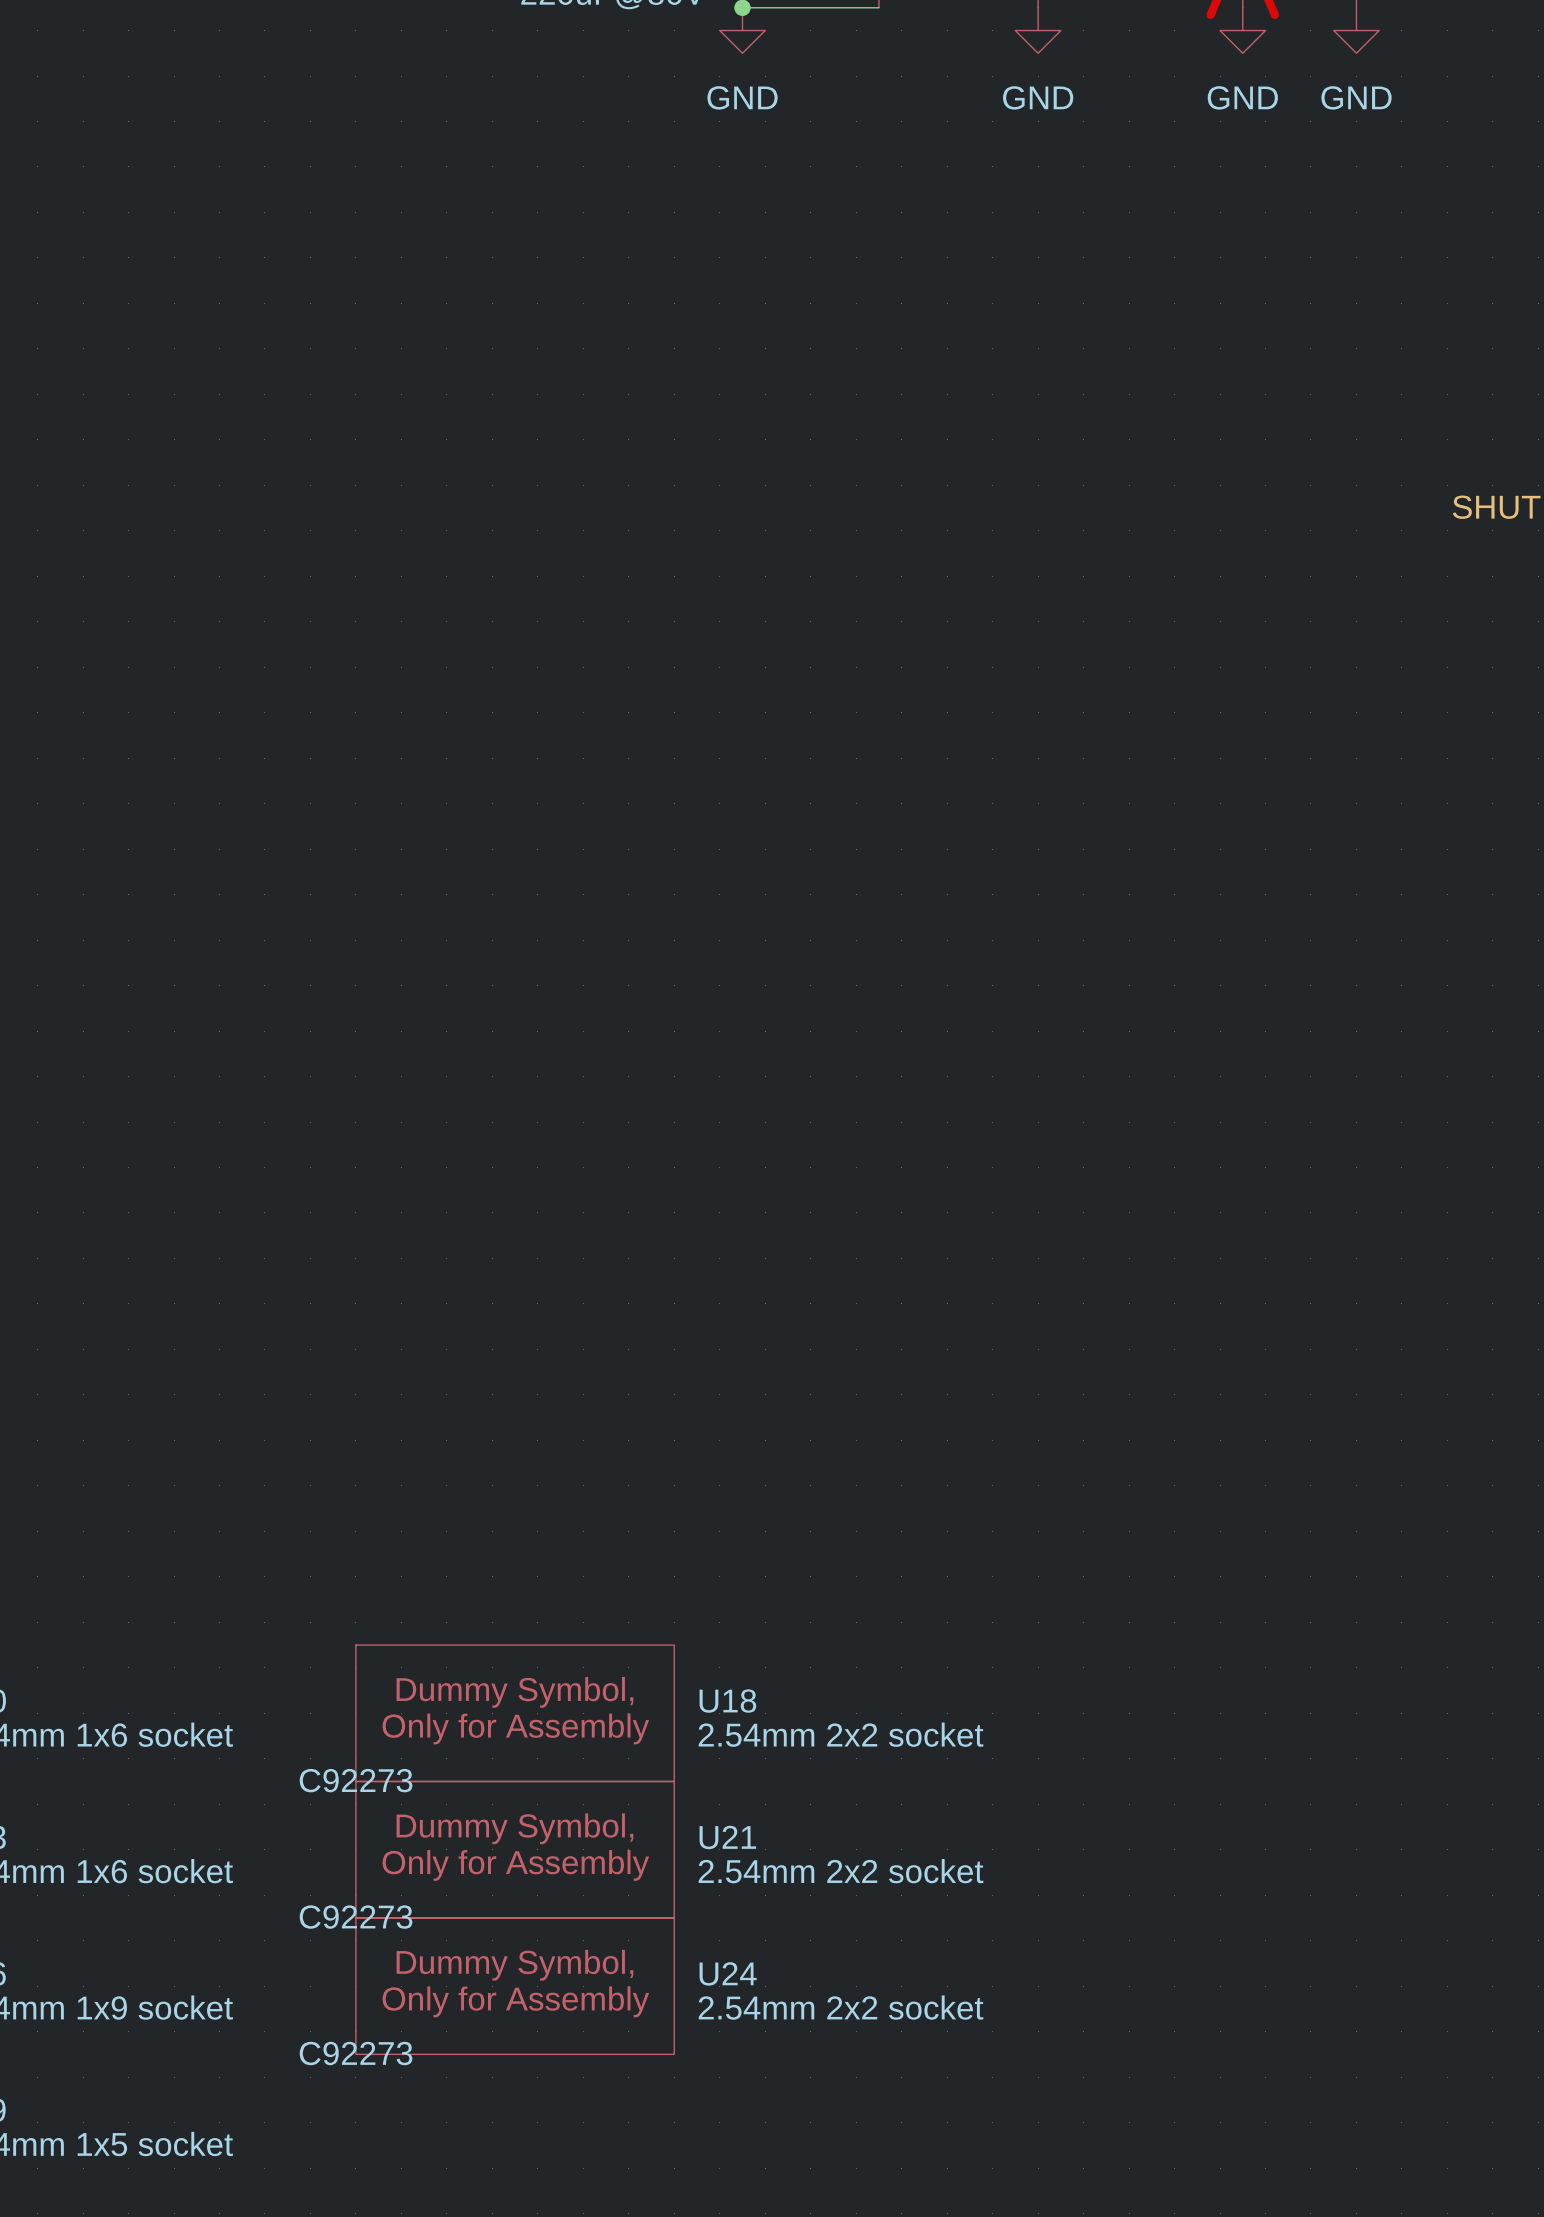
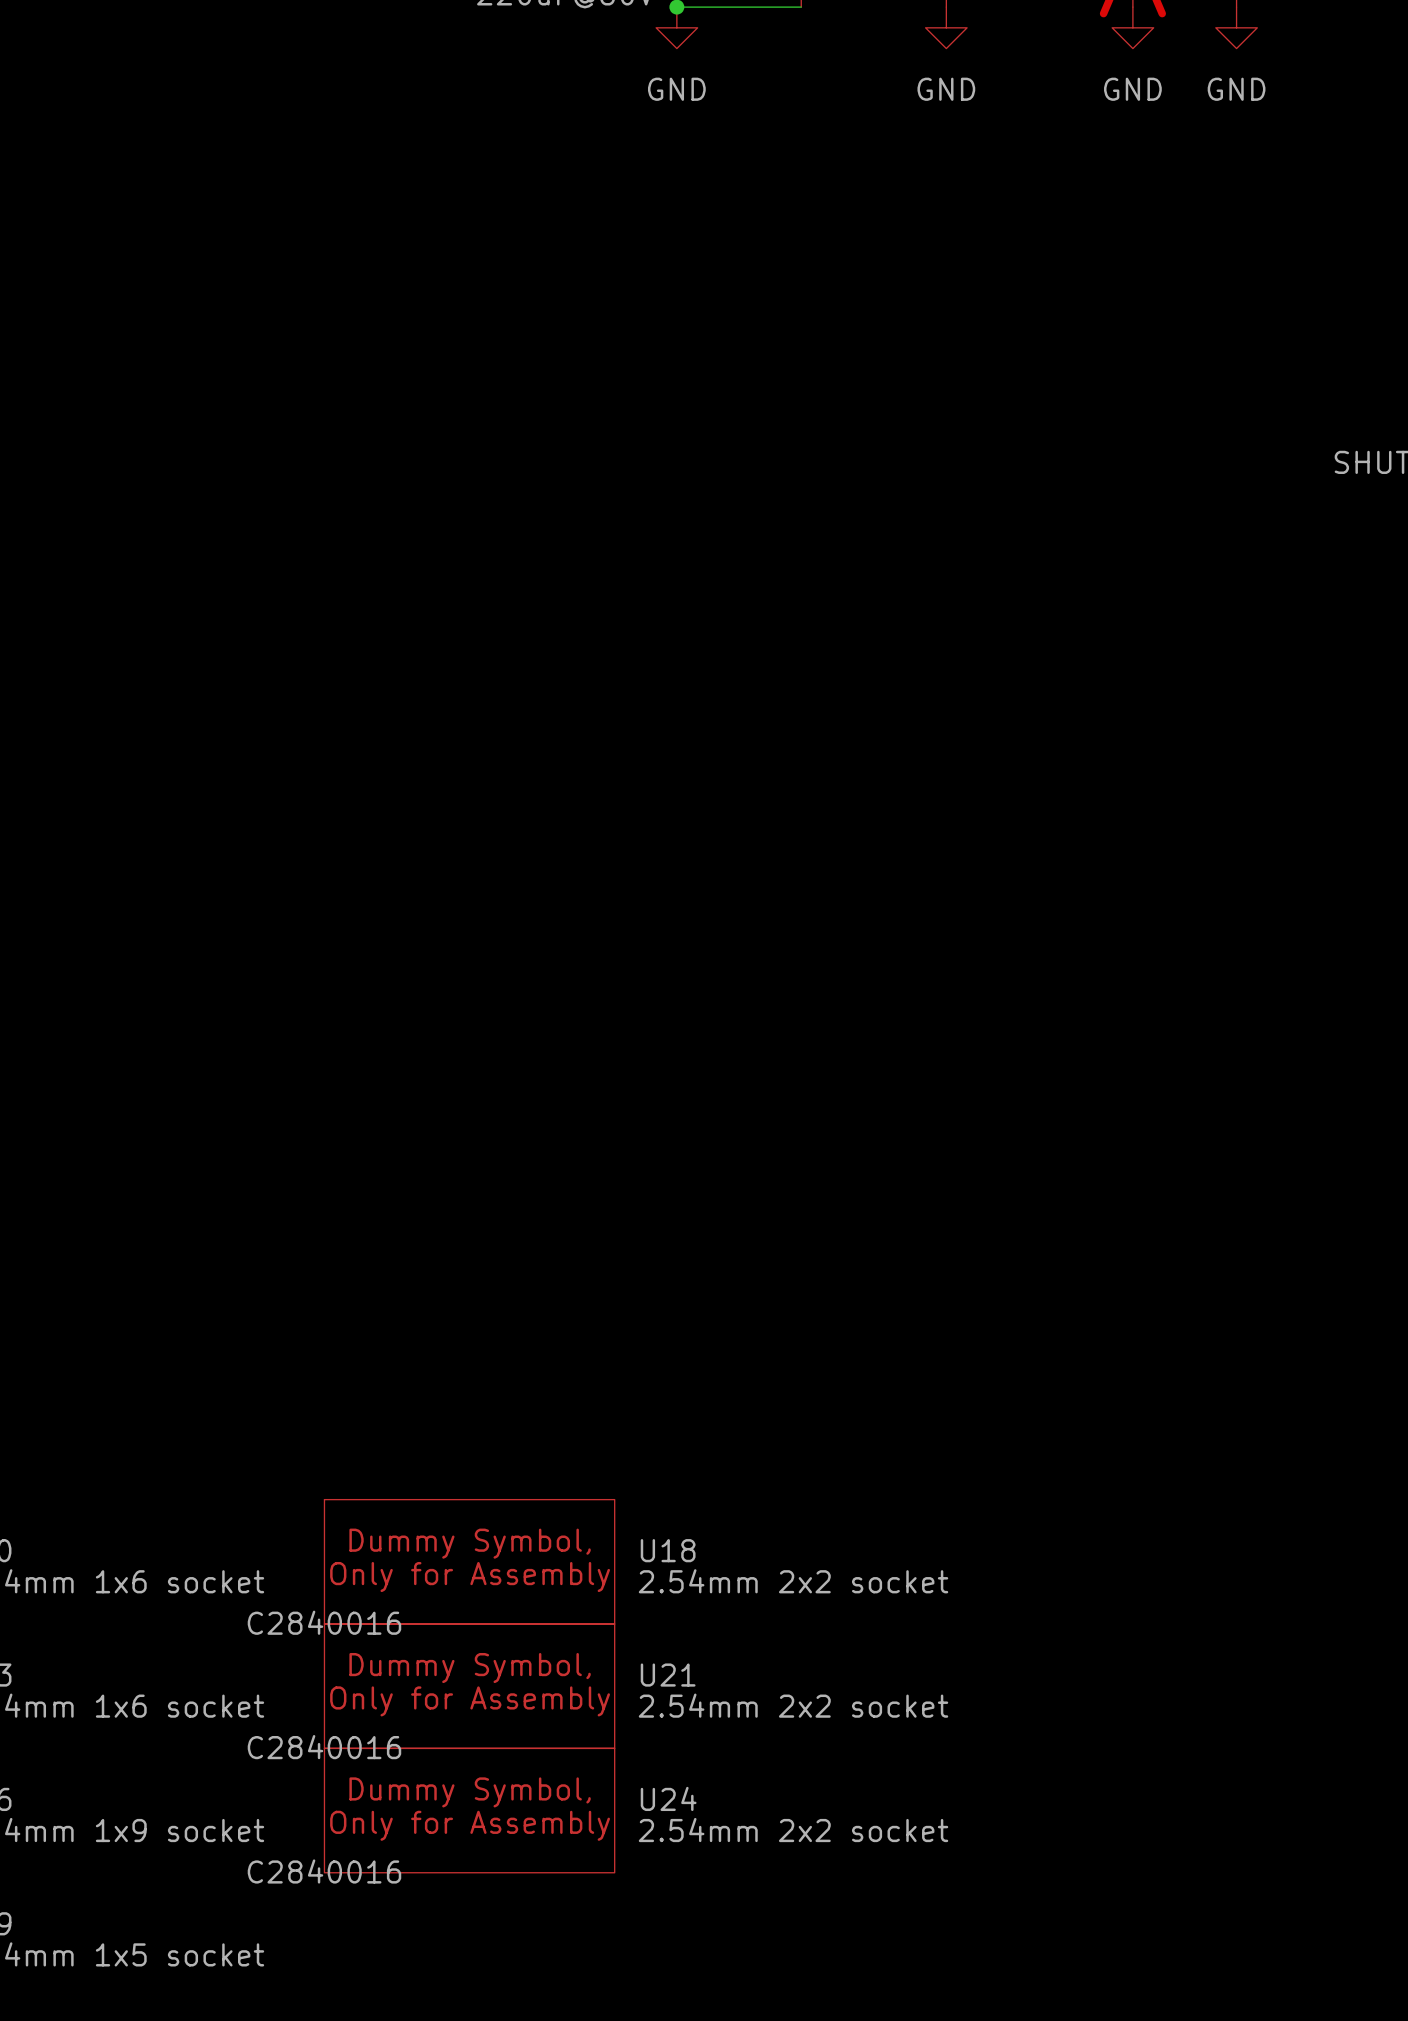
U18 text: C92273 (356, 1780) -> C2840016 (324, 1622)
U21 text: C92273 (356, 1917) -> C2840016 (324, 1747)
U24 text: C92273 (356, 2053) -> C2840016 (324, 1871)

